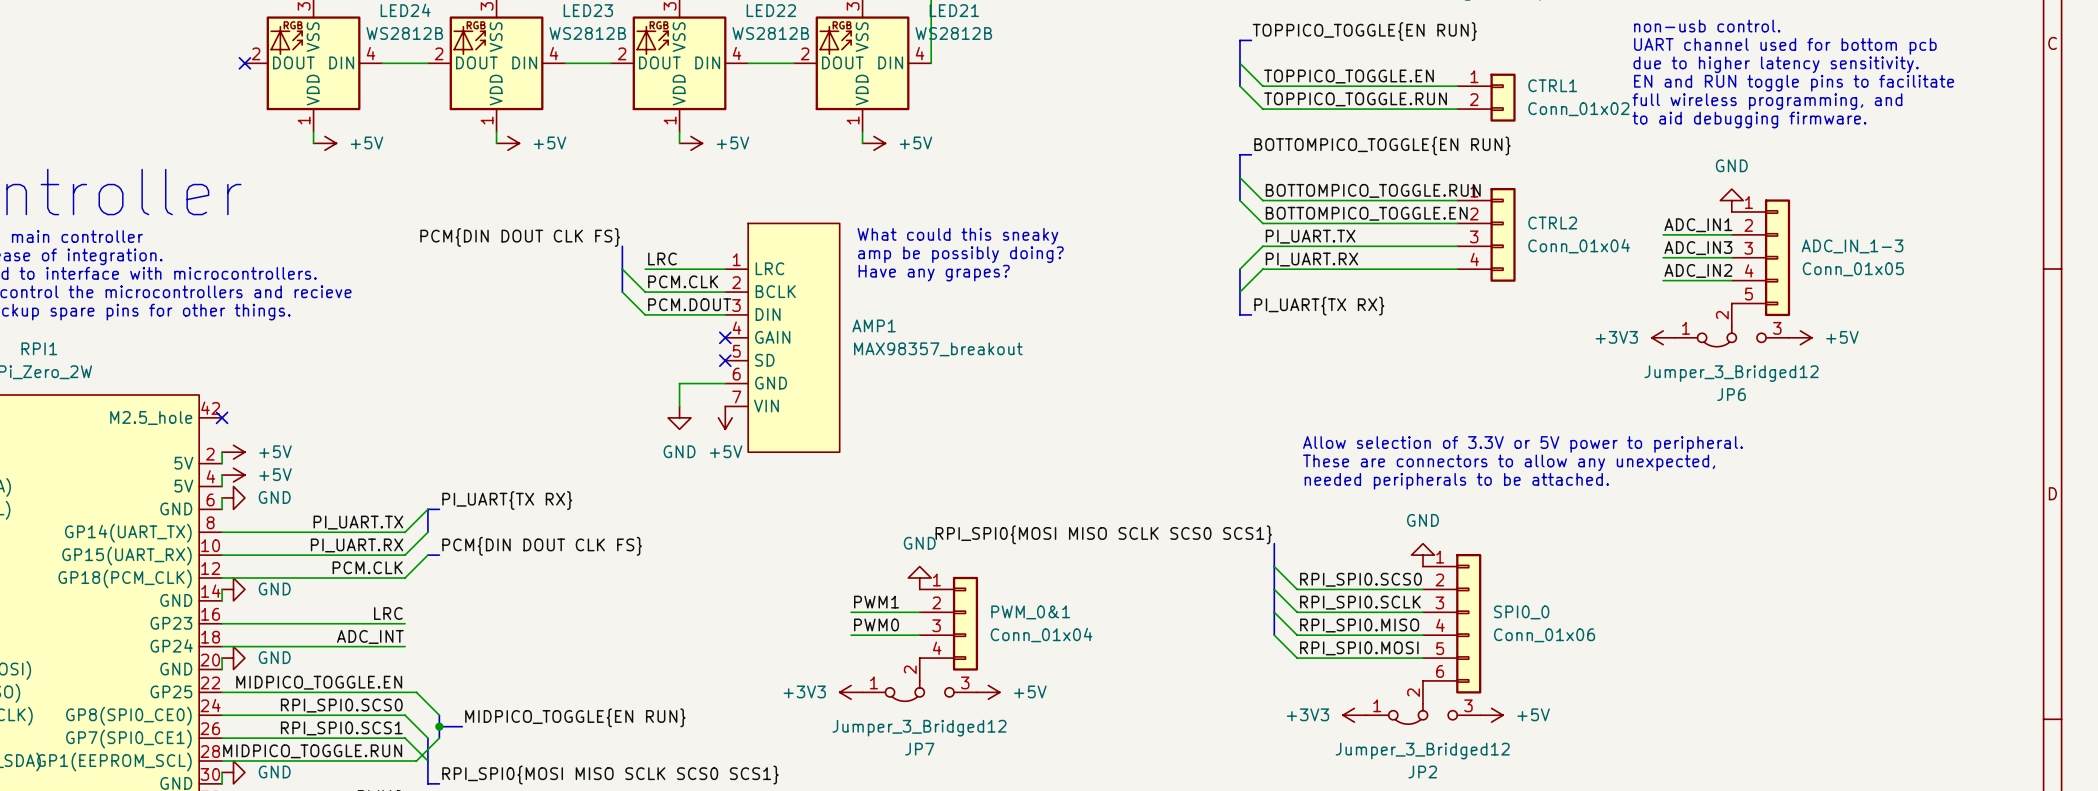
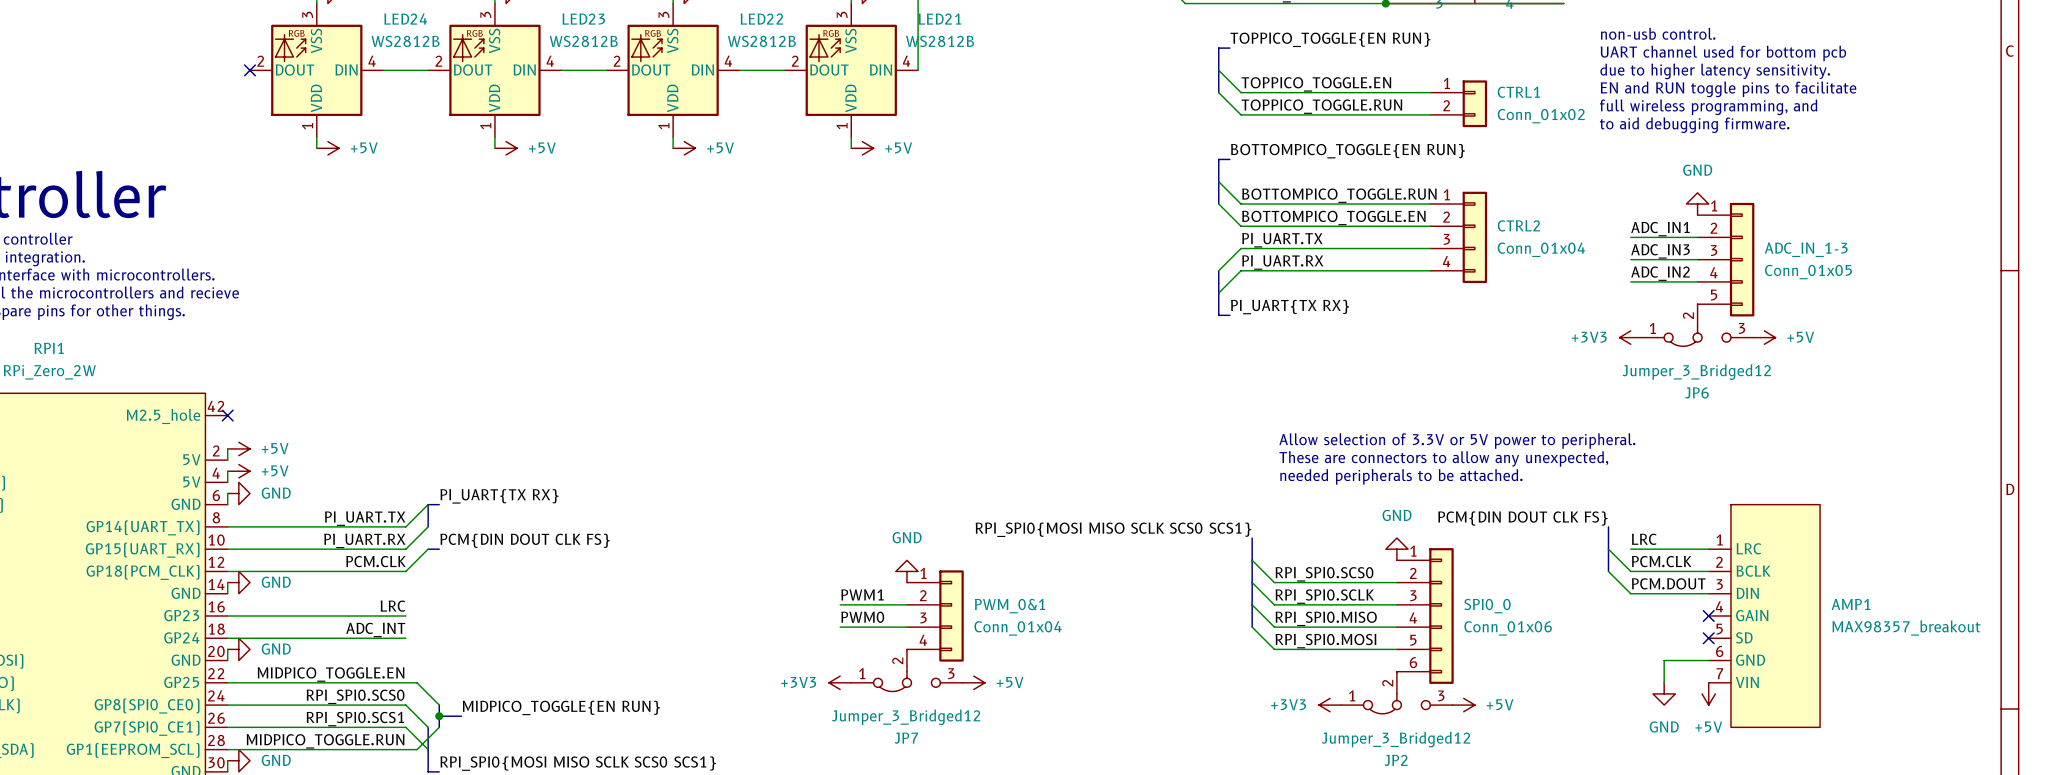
text: What could this sneaky (957, 236) -> none
label: PCM{DIN DOUT CLK FS} (520, 237) -> none
bus: (622, 246) (622, 292) -> none
text: amp be possibly doing? (960, 254) -> none
label: LRC (662, 258) -> none
wire: (622, 269) (645, 292) (725, 292) -> none
wire: (645, 269) (725, 269) -> none
text: Have any grapes? (934, 273) -> none
label: PCM.CLK (683, 281) -> none
wire: (622, 292) (645, 314) (725, 314) -> none
label: PCM.DOUT (689, 304) -> none
no-connect mark: (725, 337) -> none
AMP1 position: (782, 337) -> (1764, 615)
no-connect mark: (725, 360) -> none
wire: (725, 383) (679, 383) (679, 406) -> none
power symbol: GND (679, 417) -> none
power symbol: +5V (725, 417) -> none
label: none -> PCM{DIN DOUT CLK FS} (1522, 518)
bus: none -> (1608, 526) (1608, 571)
label: none -> LRC (1644, 539)
wire: none -> (1608, 549) (1630, 571) (1708, 571)
wire: none -> (1630, 549) (1708, 549)
label: none -> PCM.CLK (1661, 561)
wire: none -> (1608, 571) (1630, 593) (1708, 593)
label: none -> PCM.DOUT (1668, 583)
no-connect mark: none -> (1708, 615)
no-connect mark: none -> (1708, 638)
wire: none -> (1708, 660) (1664, 660) (1664, 682)
power symbol: none -> GND (1664, 693)
power symbol: none -> +5V (1708, 693)

